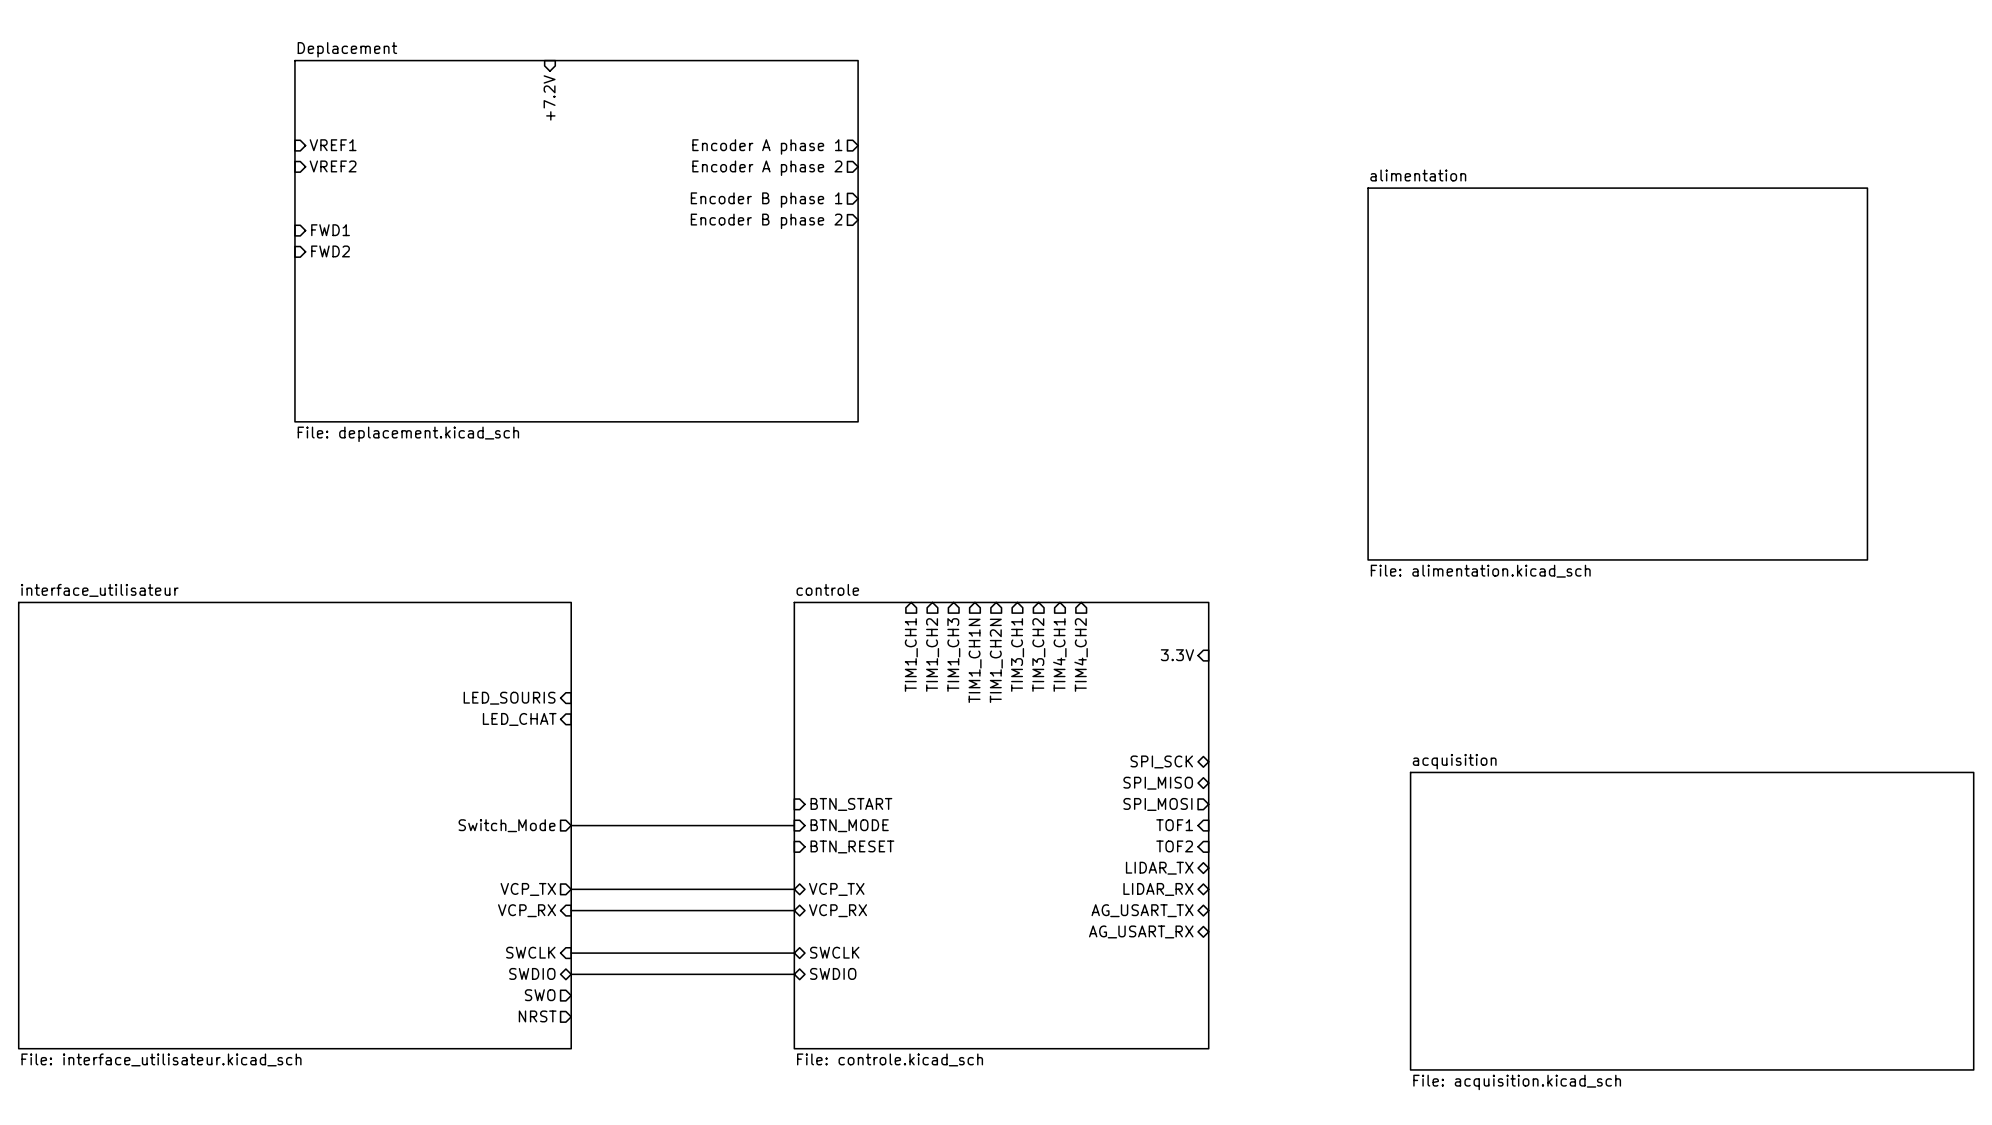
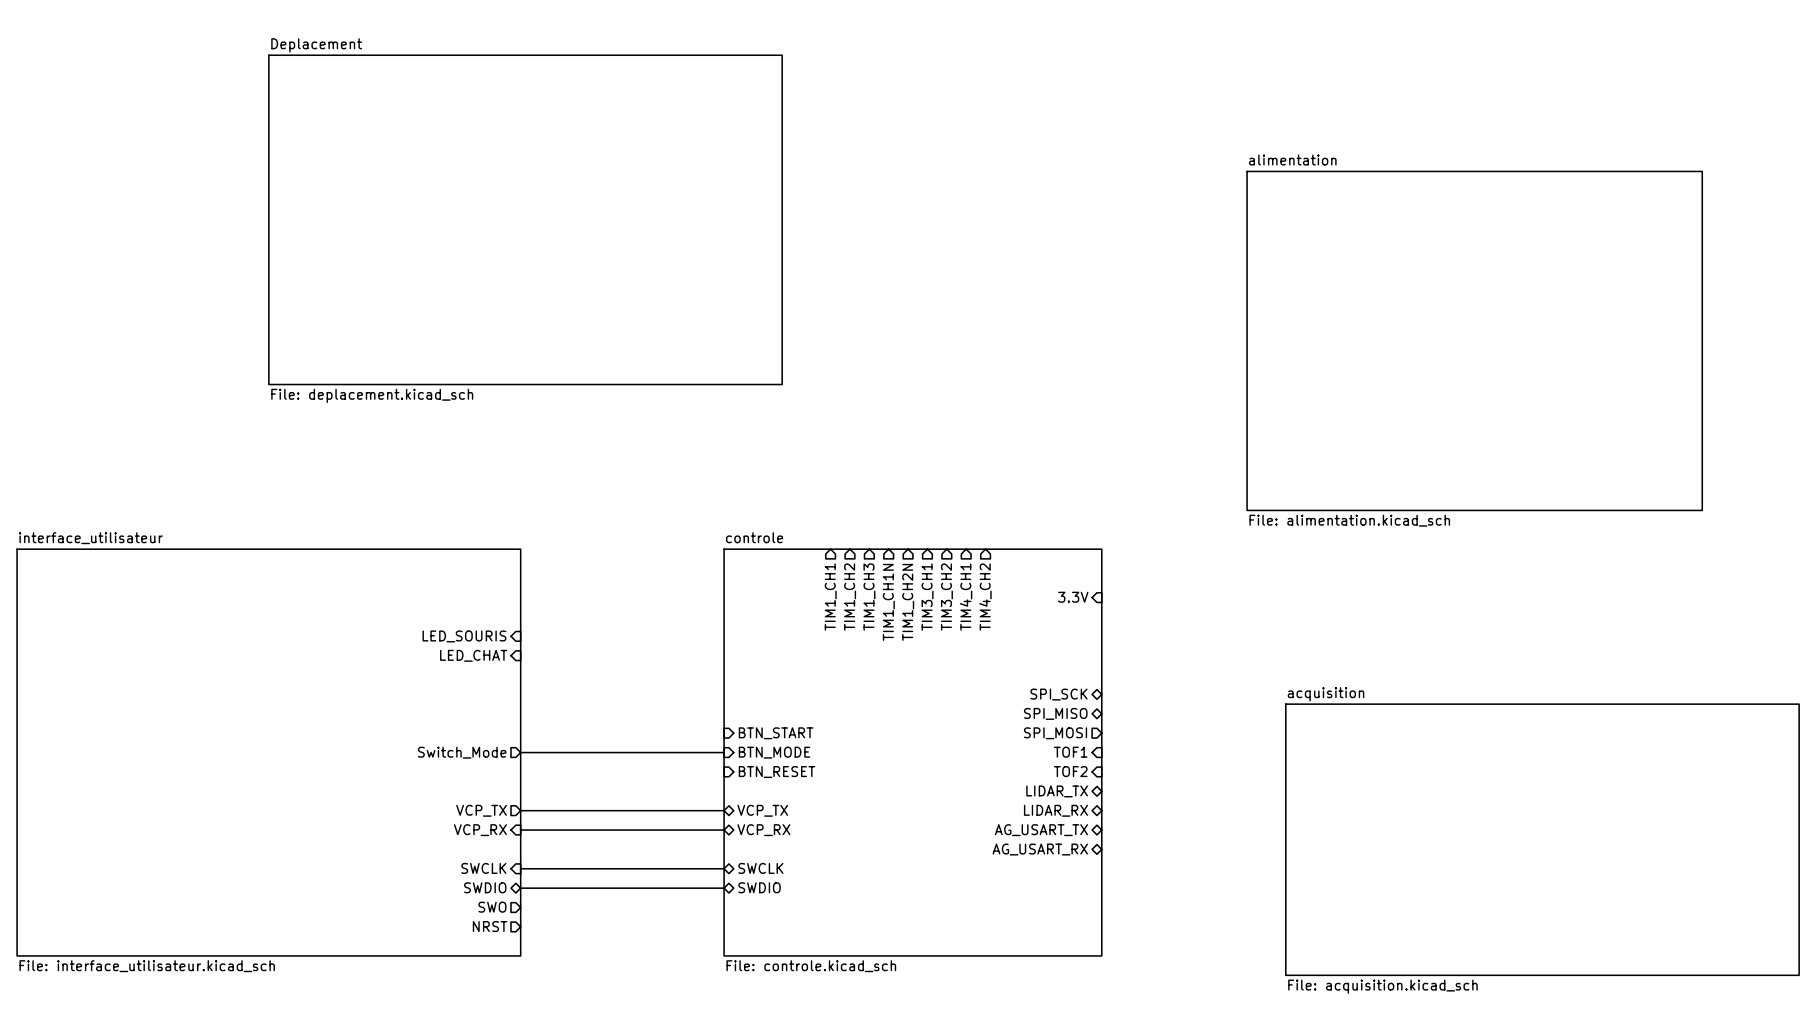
sheet pin: +7.2V (549, 97) -> none
sheet pin: VREF1 (333, 145) -> none
sheet pin: Encoder A phase 1 (767, 146) -> none
sheet pin: VREF2 (333, 166) -> none
sheet pin: Encoder A phase 2 (767, 168) -> none
sheet pin: Encoder B phase 1 (766, 200) -> none
sheet pin: Encoder B phase 2 (766, 221) -> none
sheet pin: FWD1 (330, 230) -> none
sheet pin: FWD2 (330, 251) -> none

